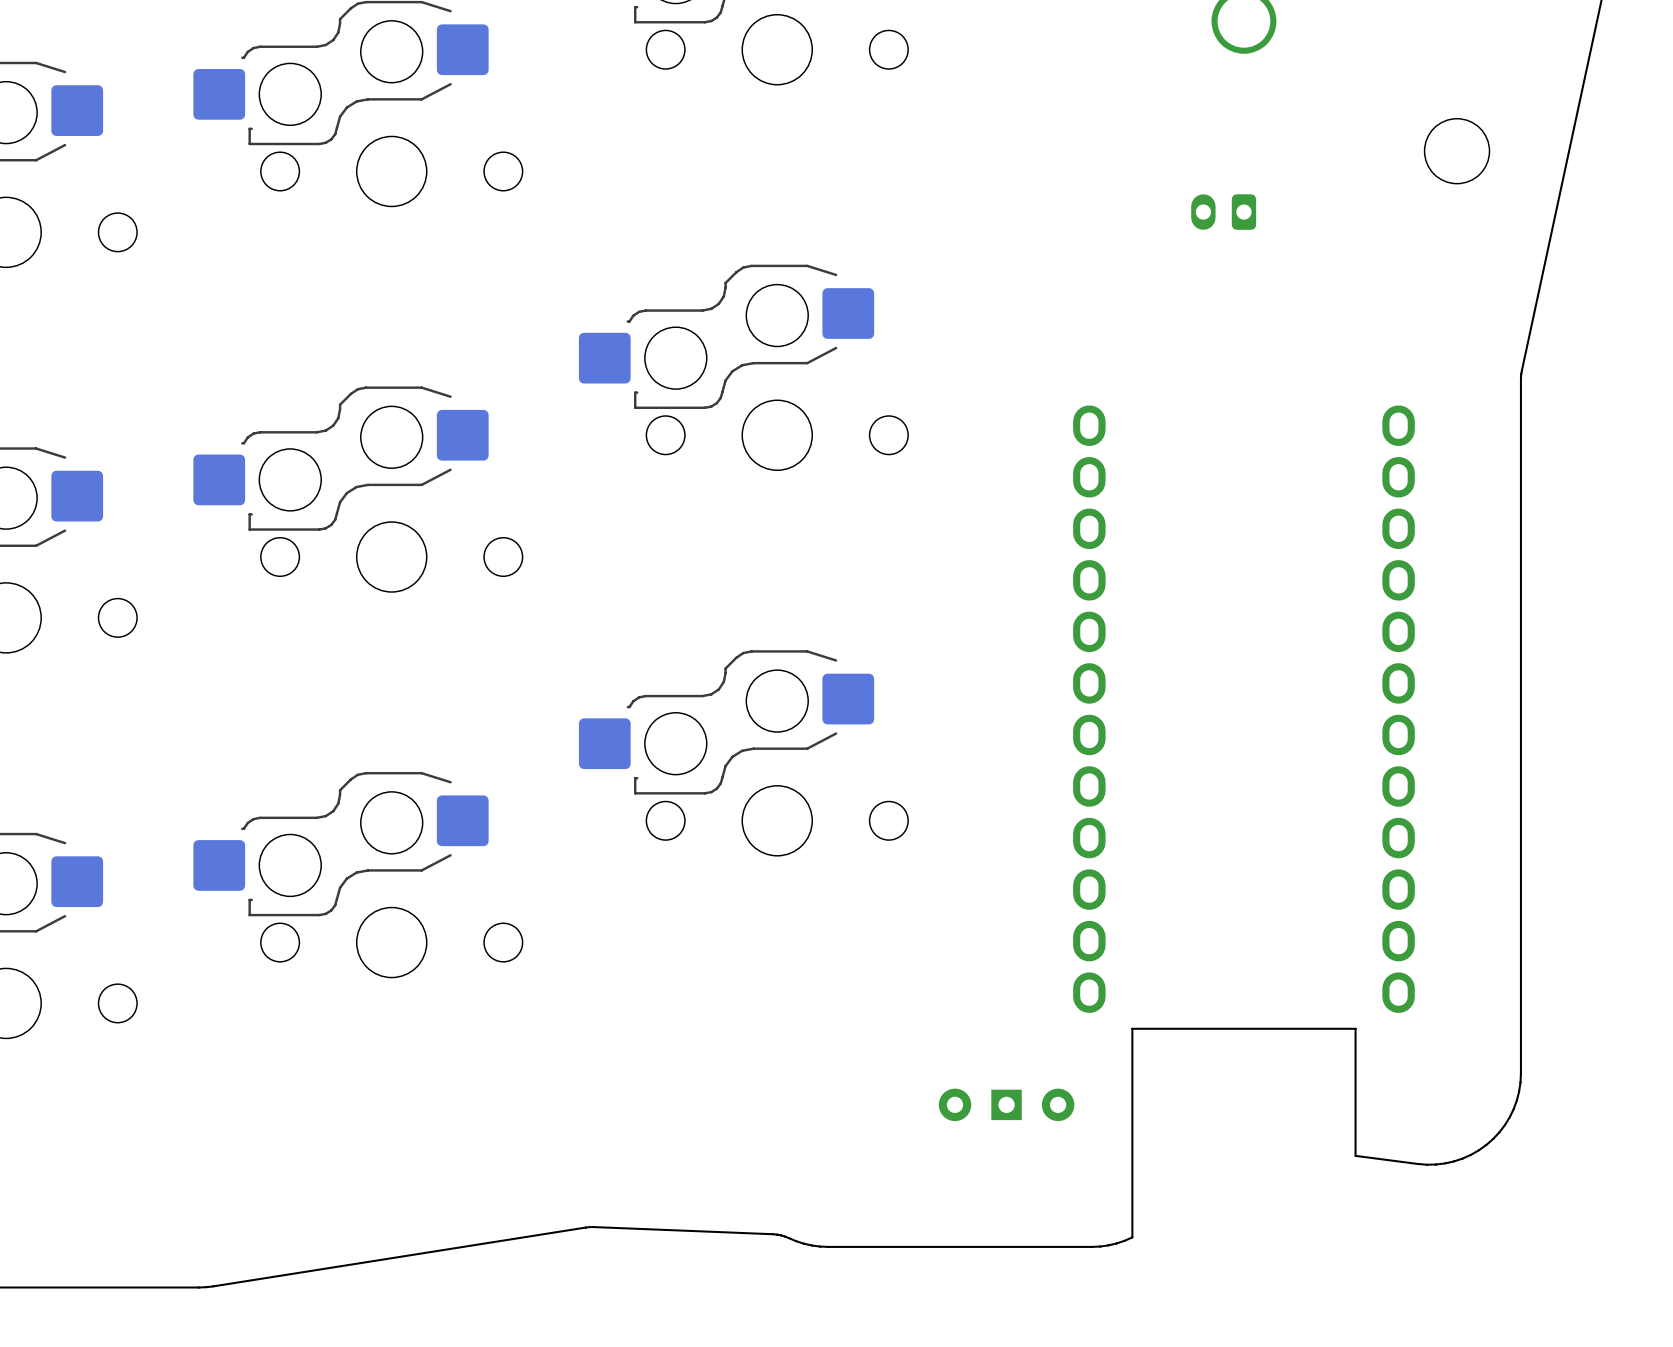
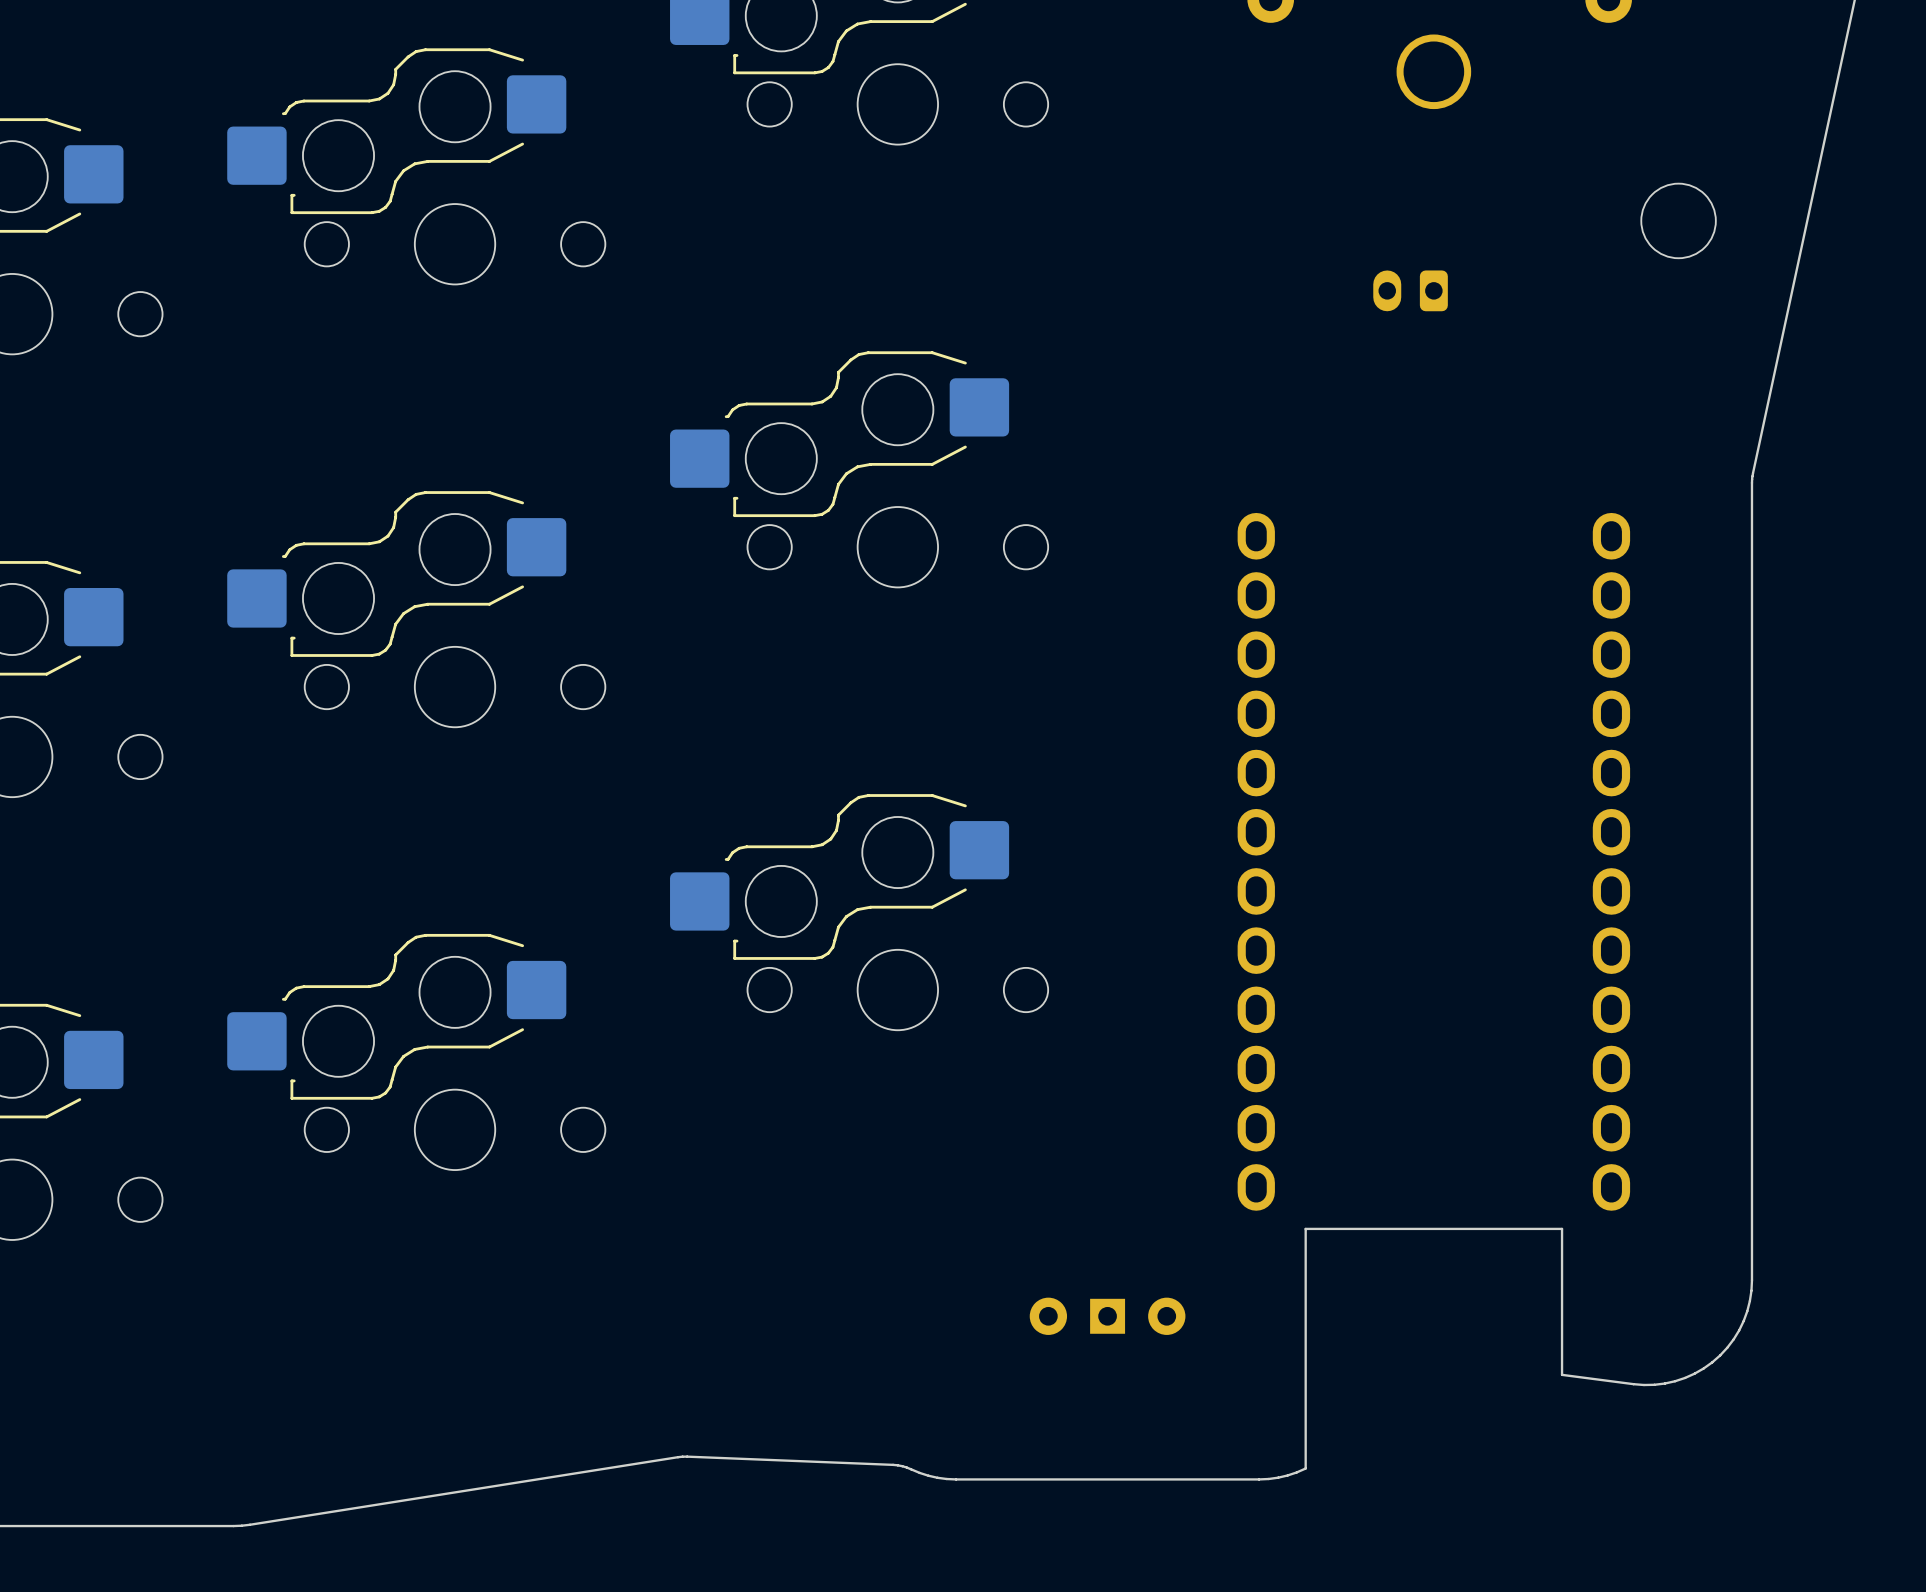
part position: (1006, 1104) -> (1107, 1316)

